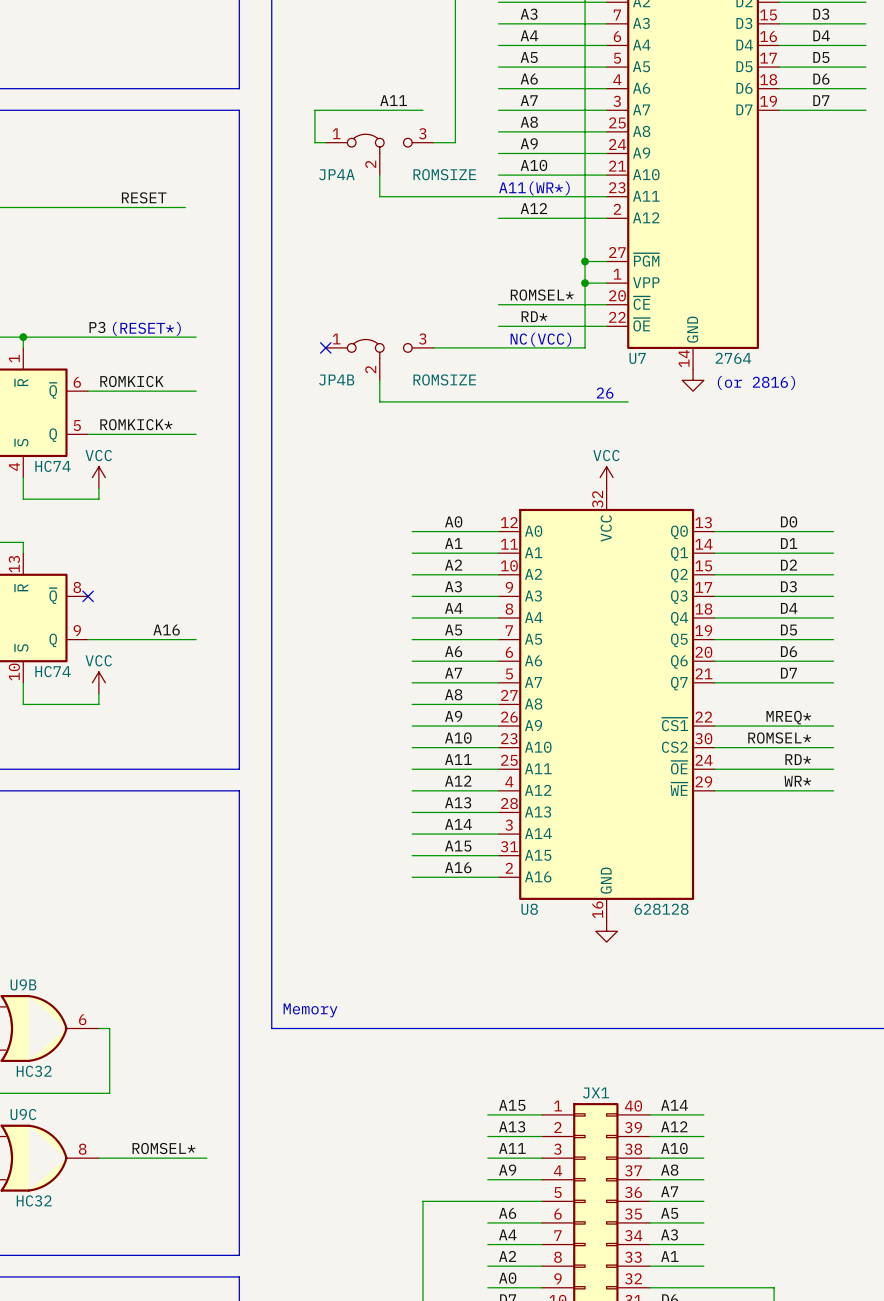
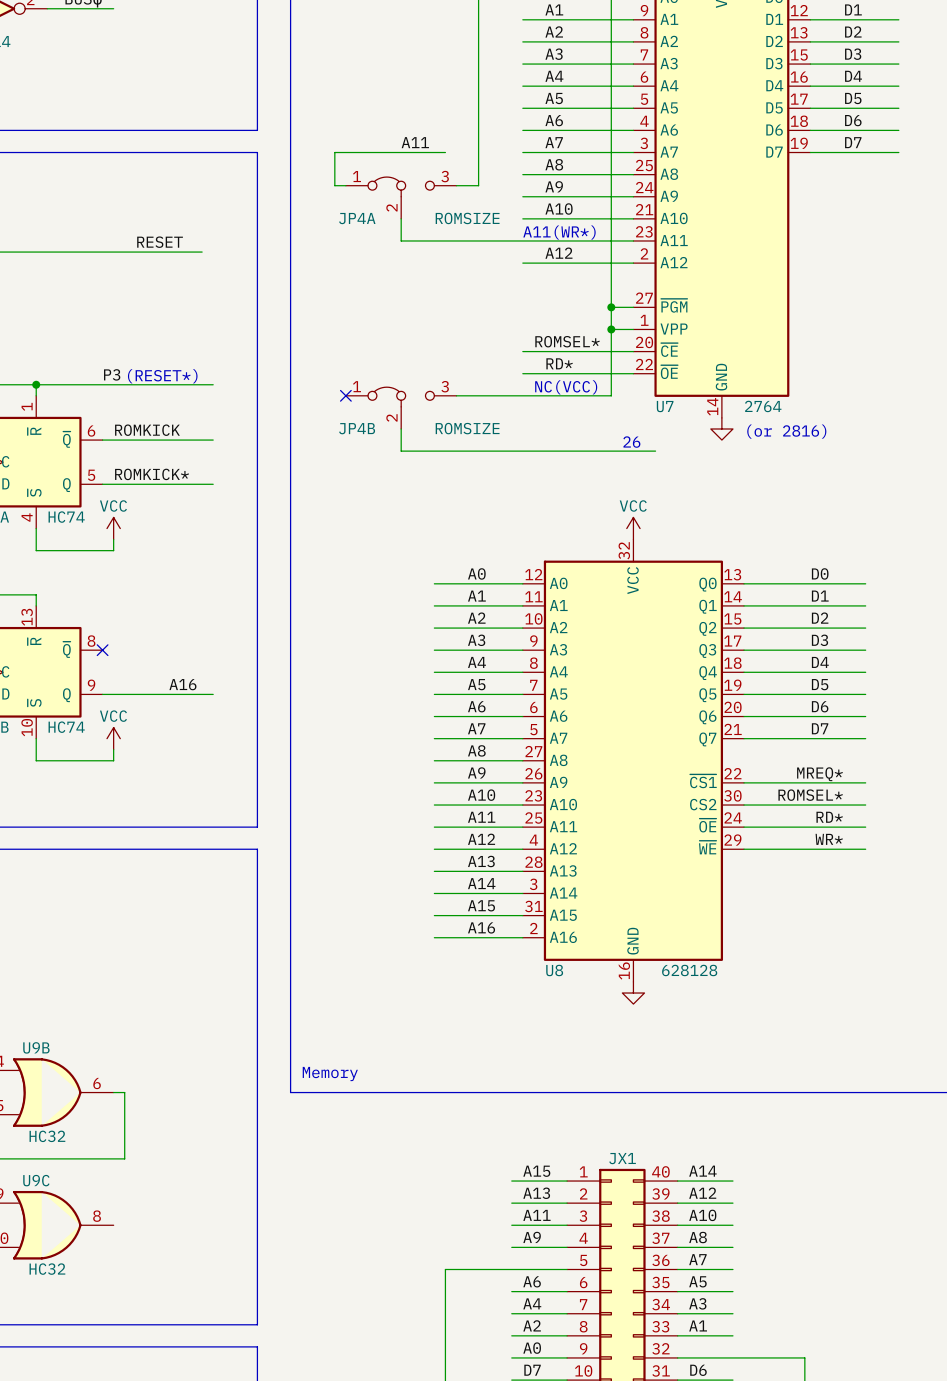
label: ROMSEL* (163, 1148) -> none
wire: (98, 1158) (206, 1158) -> none

